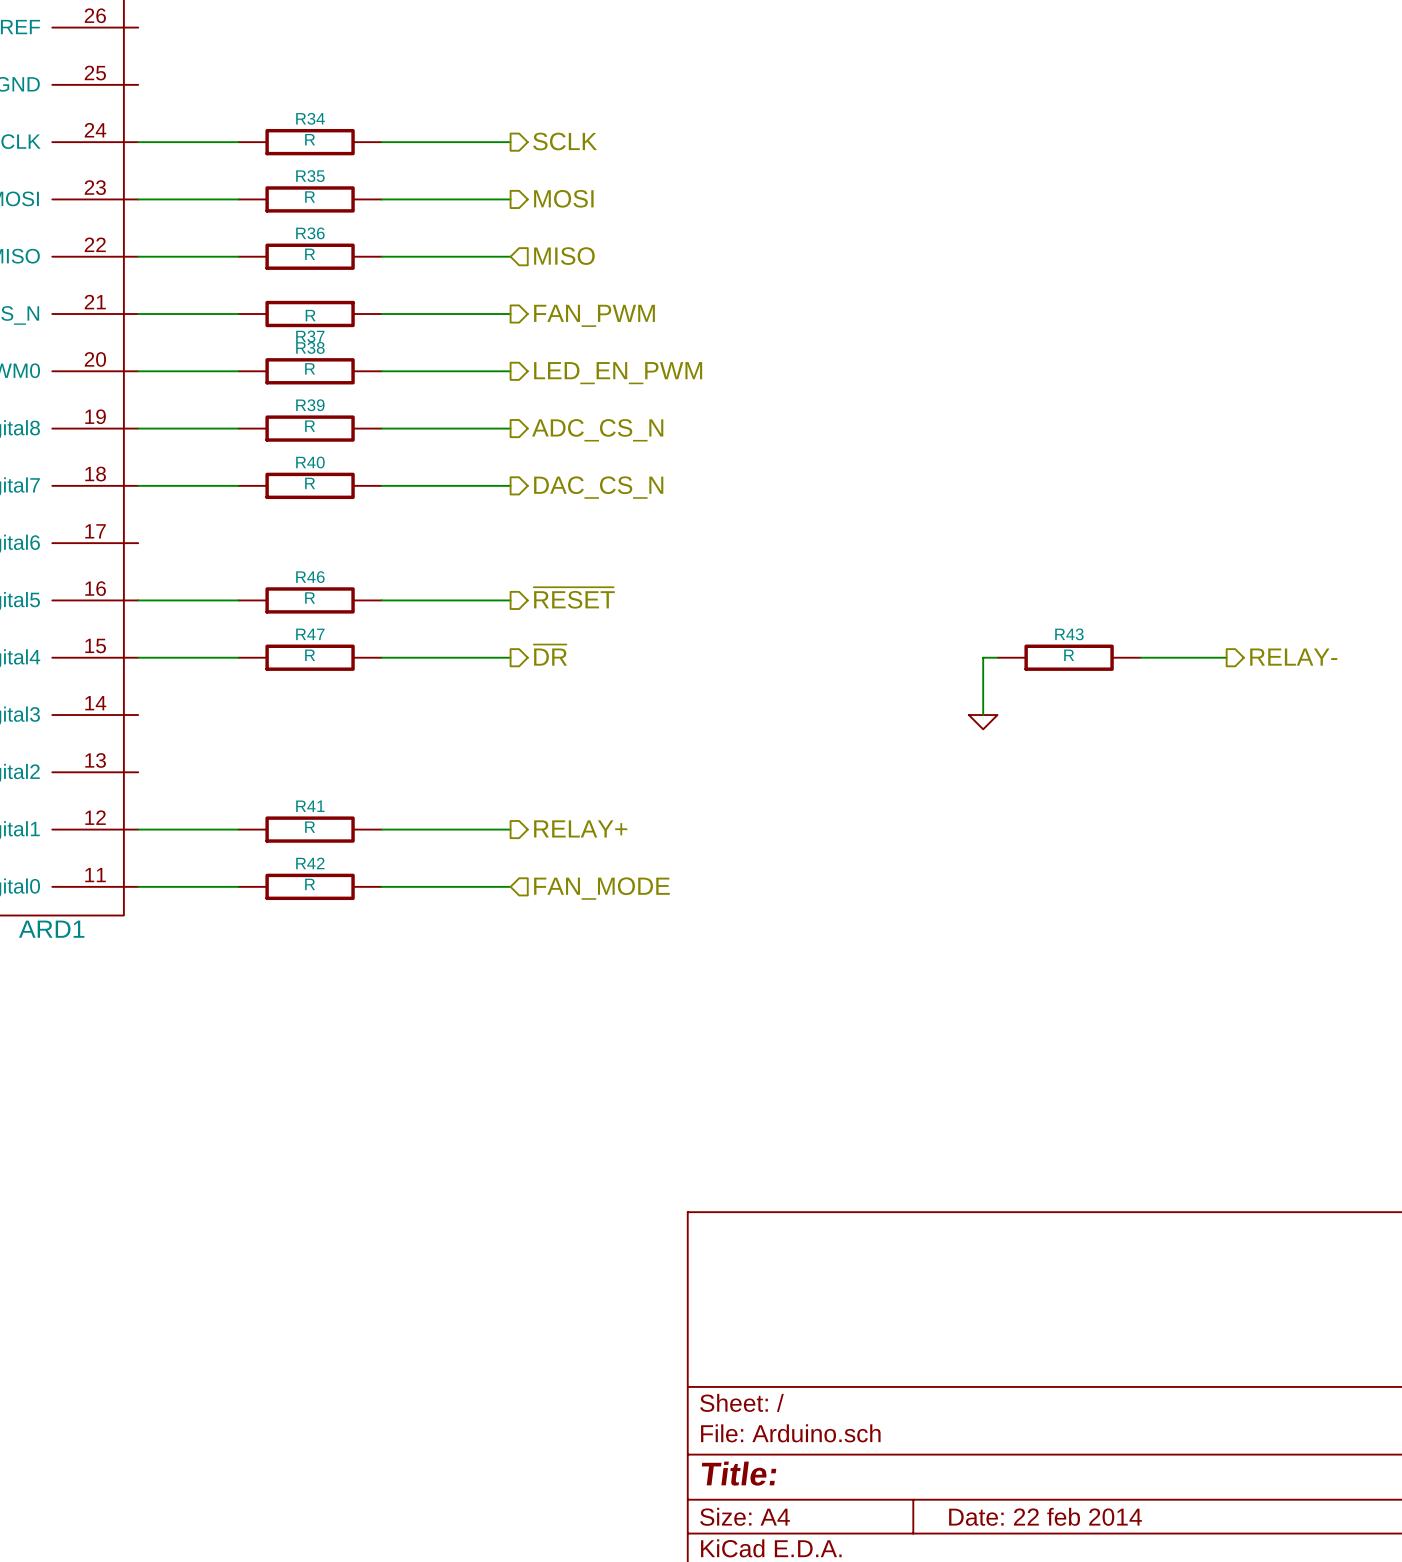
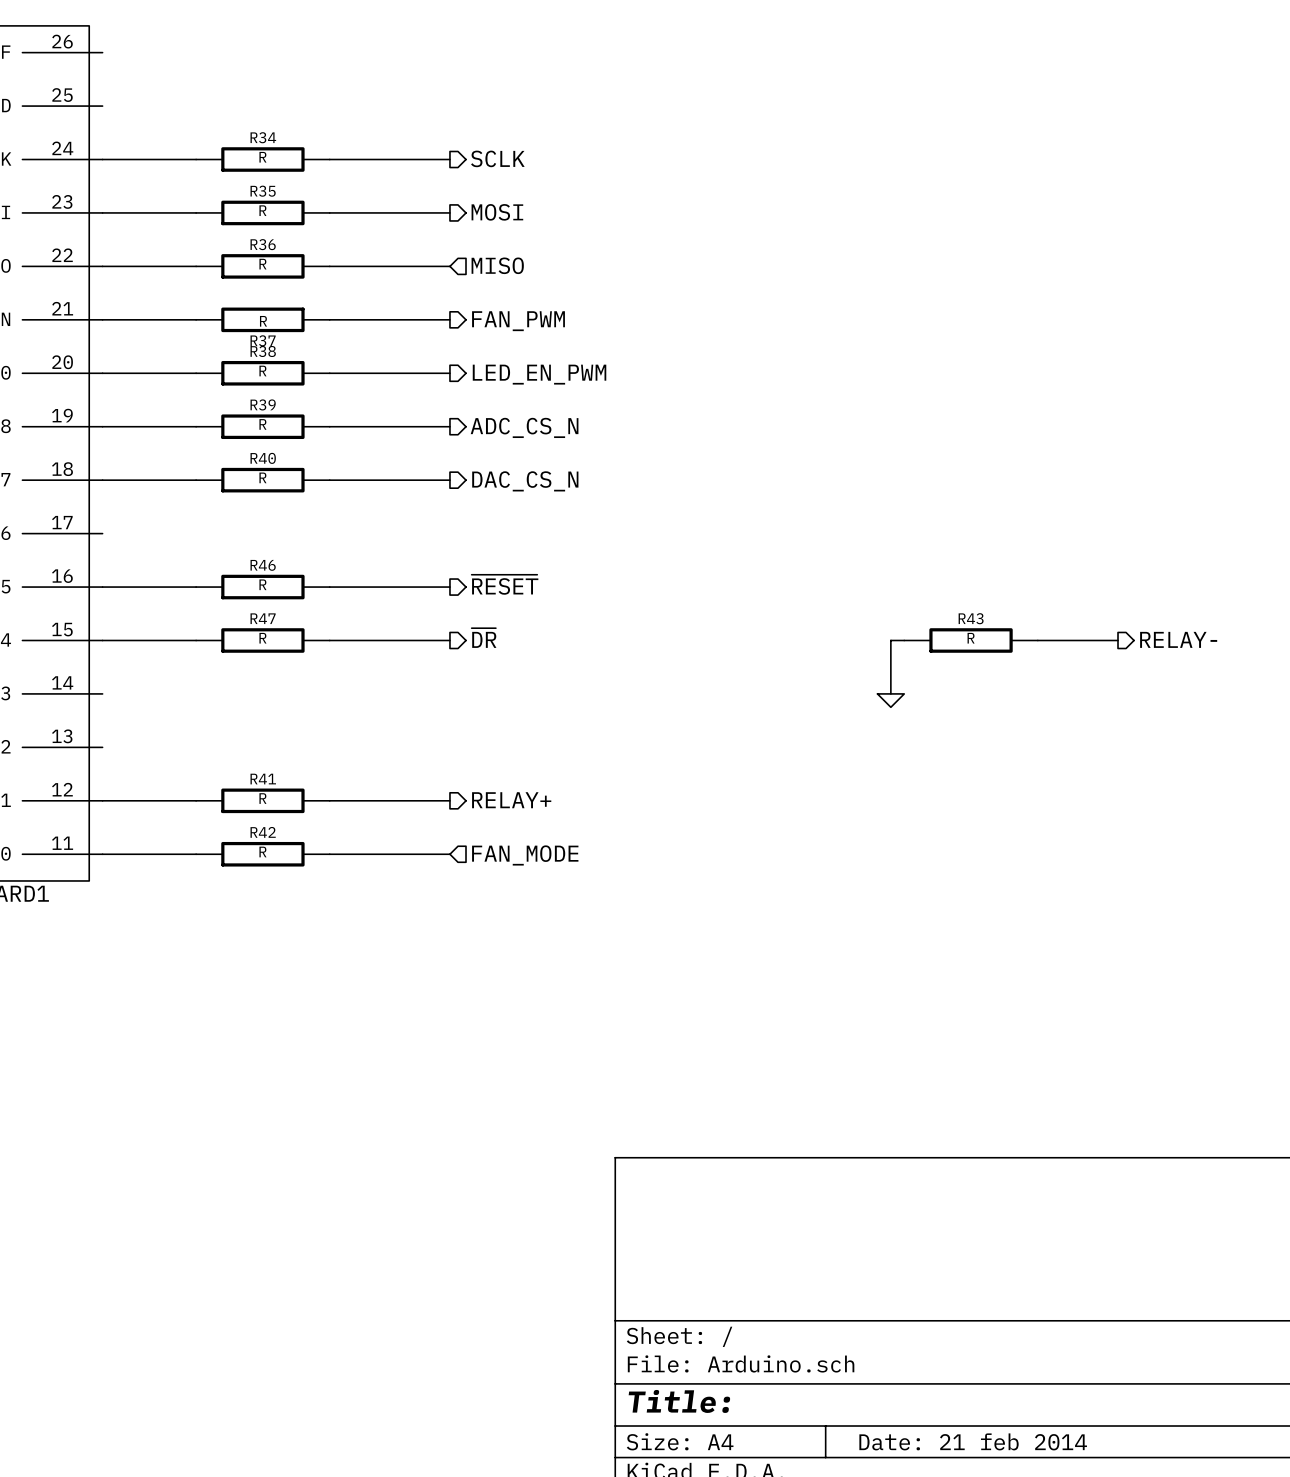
title block: Date: 22 feb 2014 (1045, 1516) -> Date: 21 feb 2014 (973, 1441)

